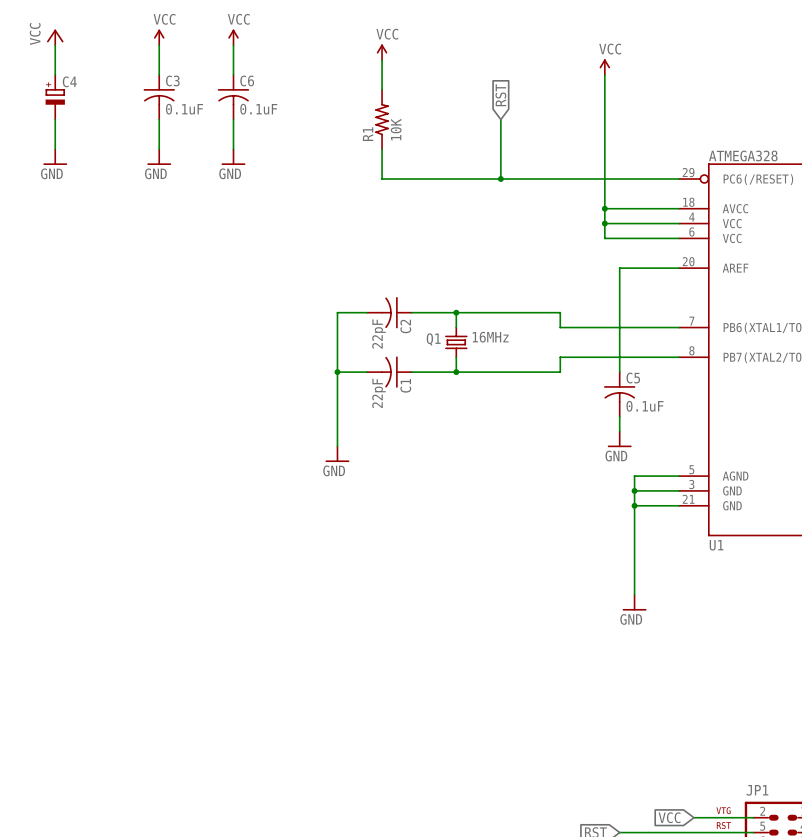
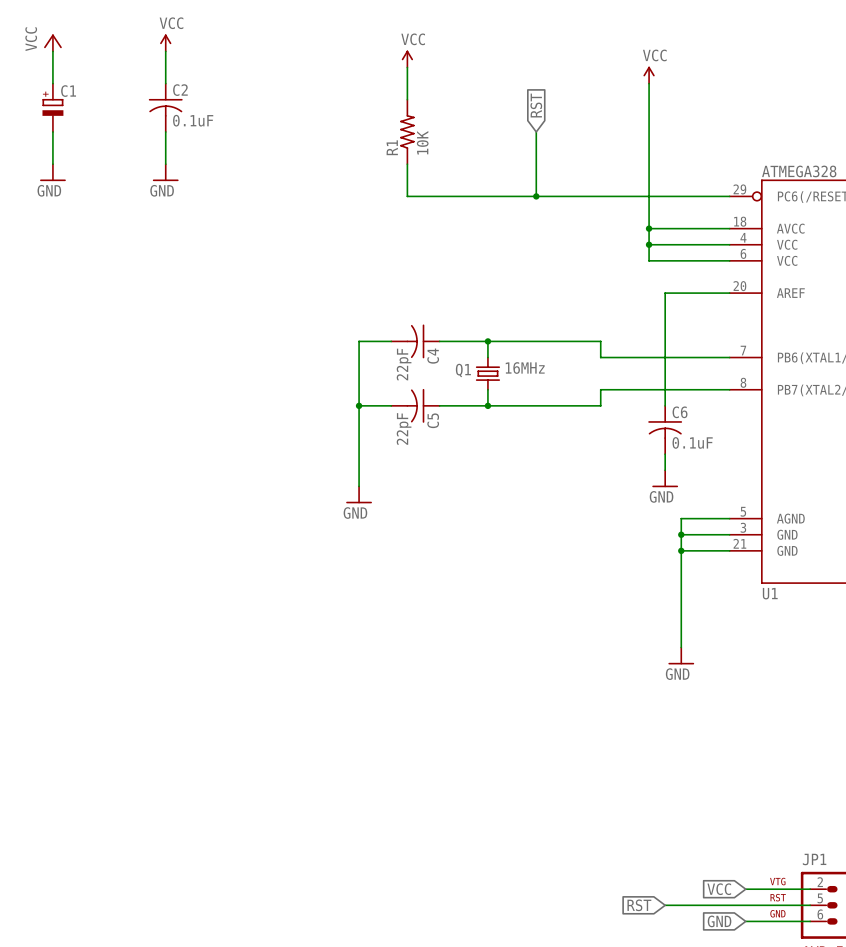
power symbol: VCC (233, 37) -> none
wire: (233, 45) (233, 75) -> none
C3 name: C3 (172, 80) -> C2 (180, 90)
C4 name: C4 (69, 81) -> C1 (68, 91)
C6: 0.1uF (233, 97) -> none
wire: (233, 119) (233, 149) -> none
power symbol: GND (233, 157) -> none
C2 name: C2 (405, 326) -> C4 (433, 356)
C5 name: C5 (633, 378) -> C6 (680, 412)
C1 name: C1 (405, 385) -> C5 (433, 420)

